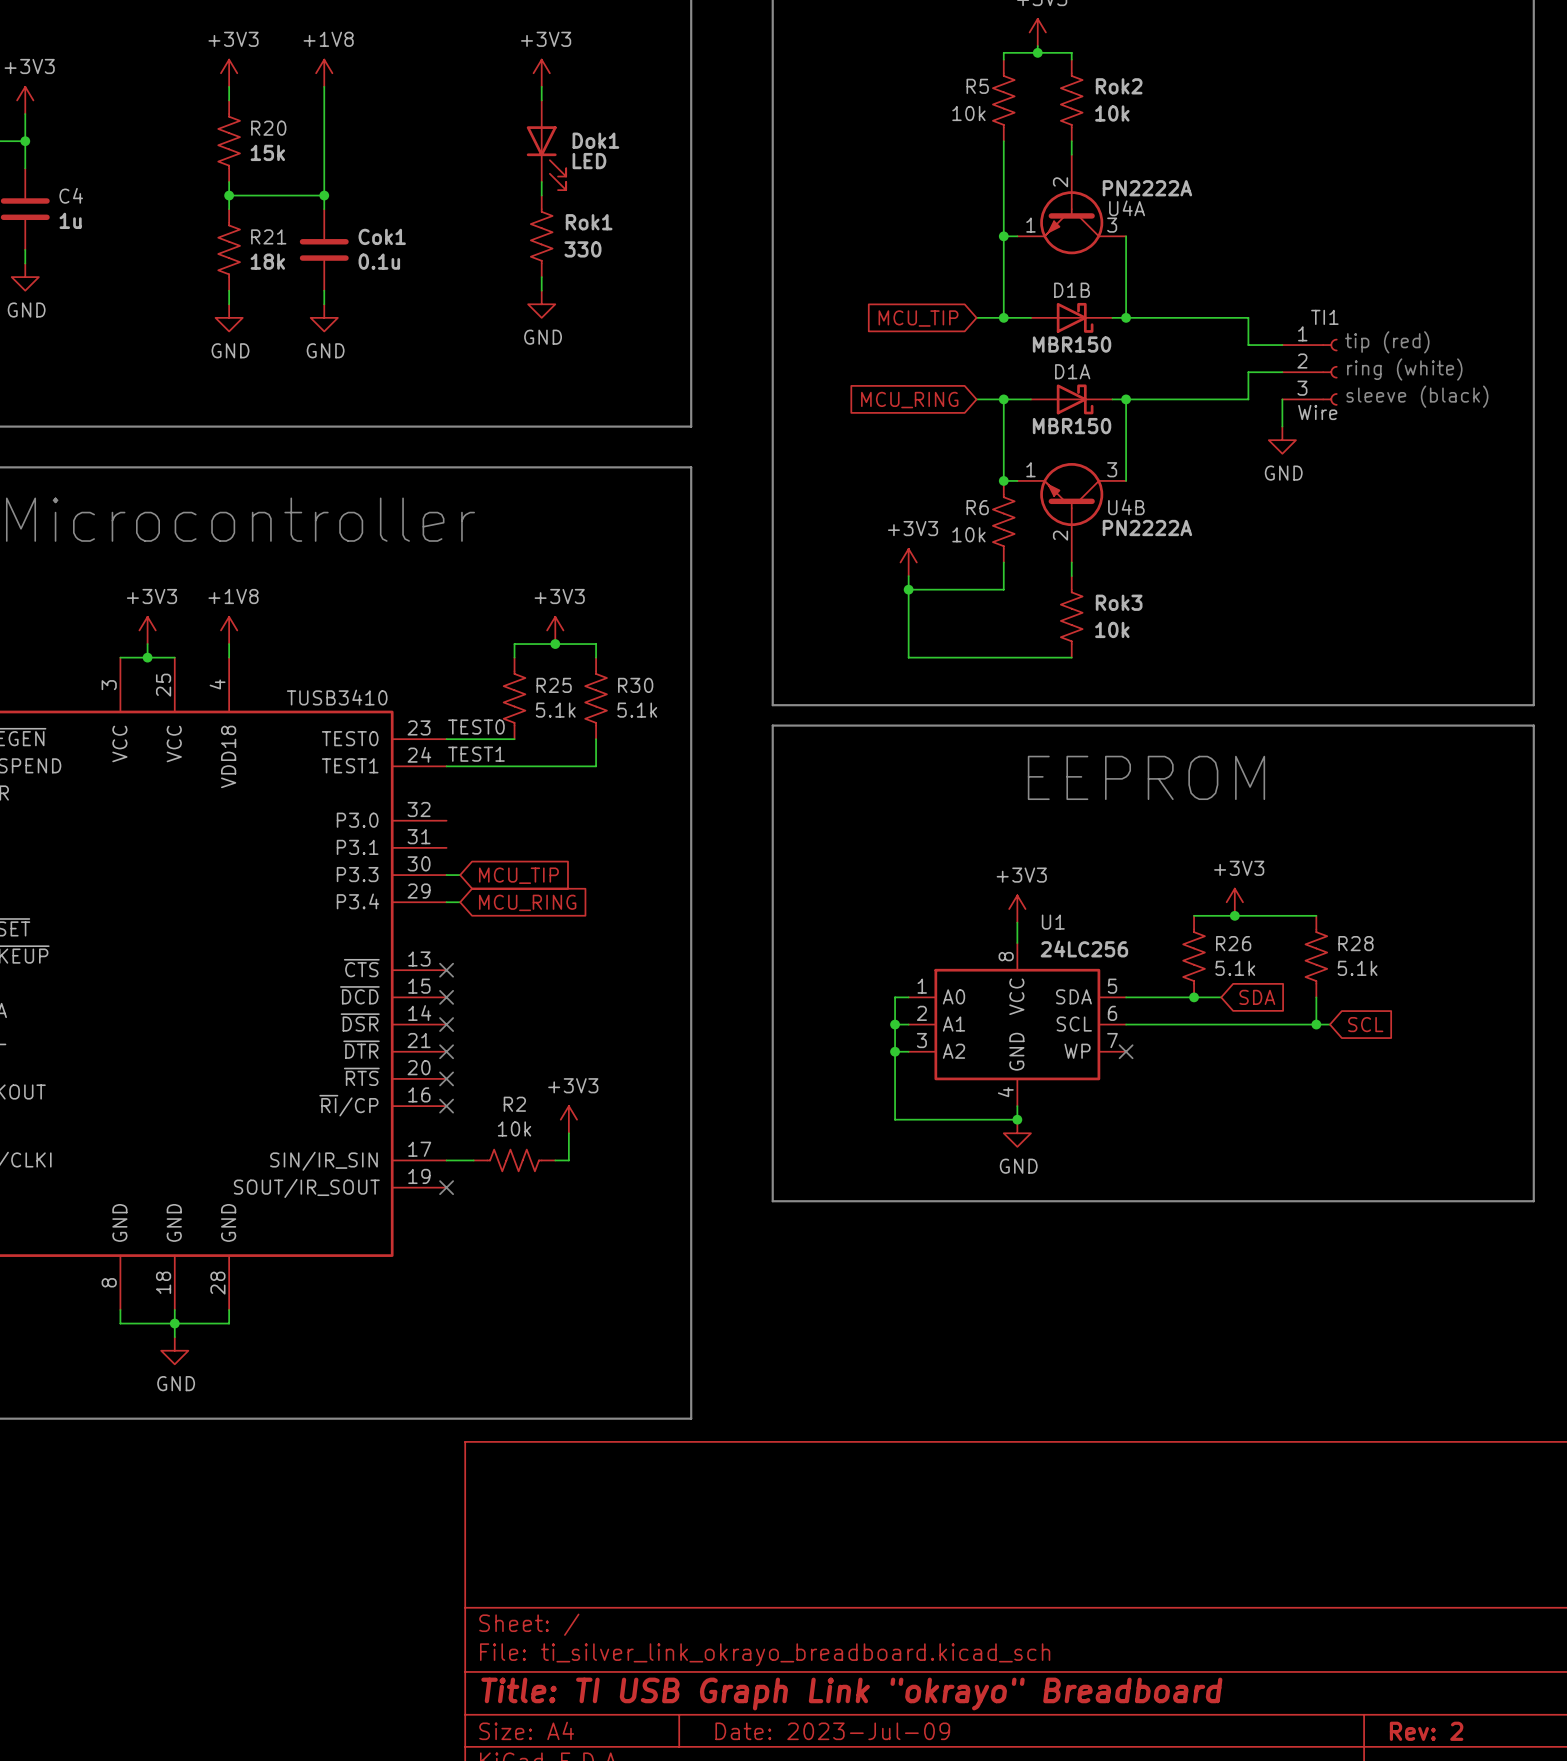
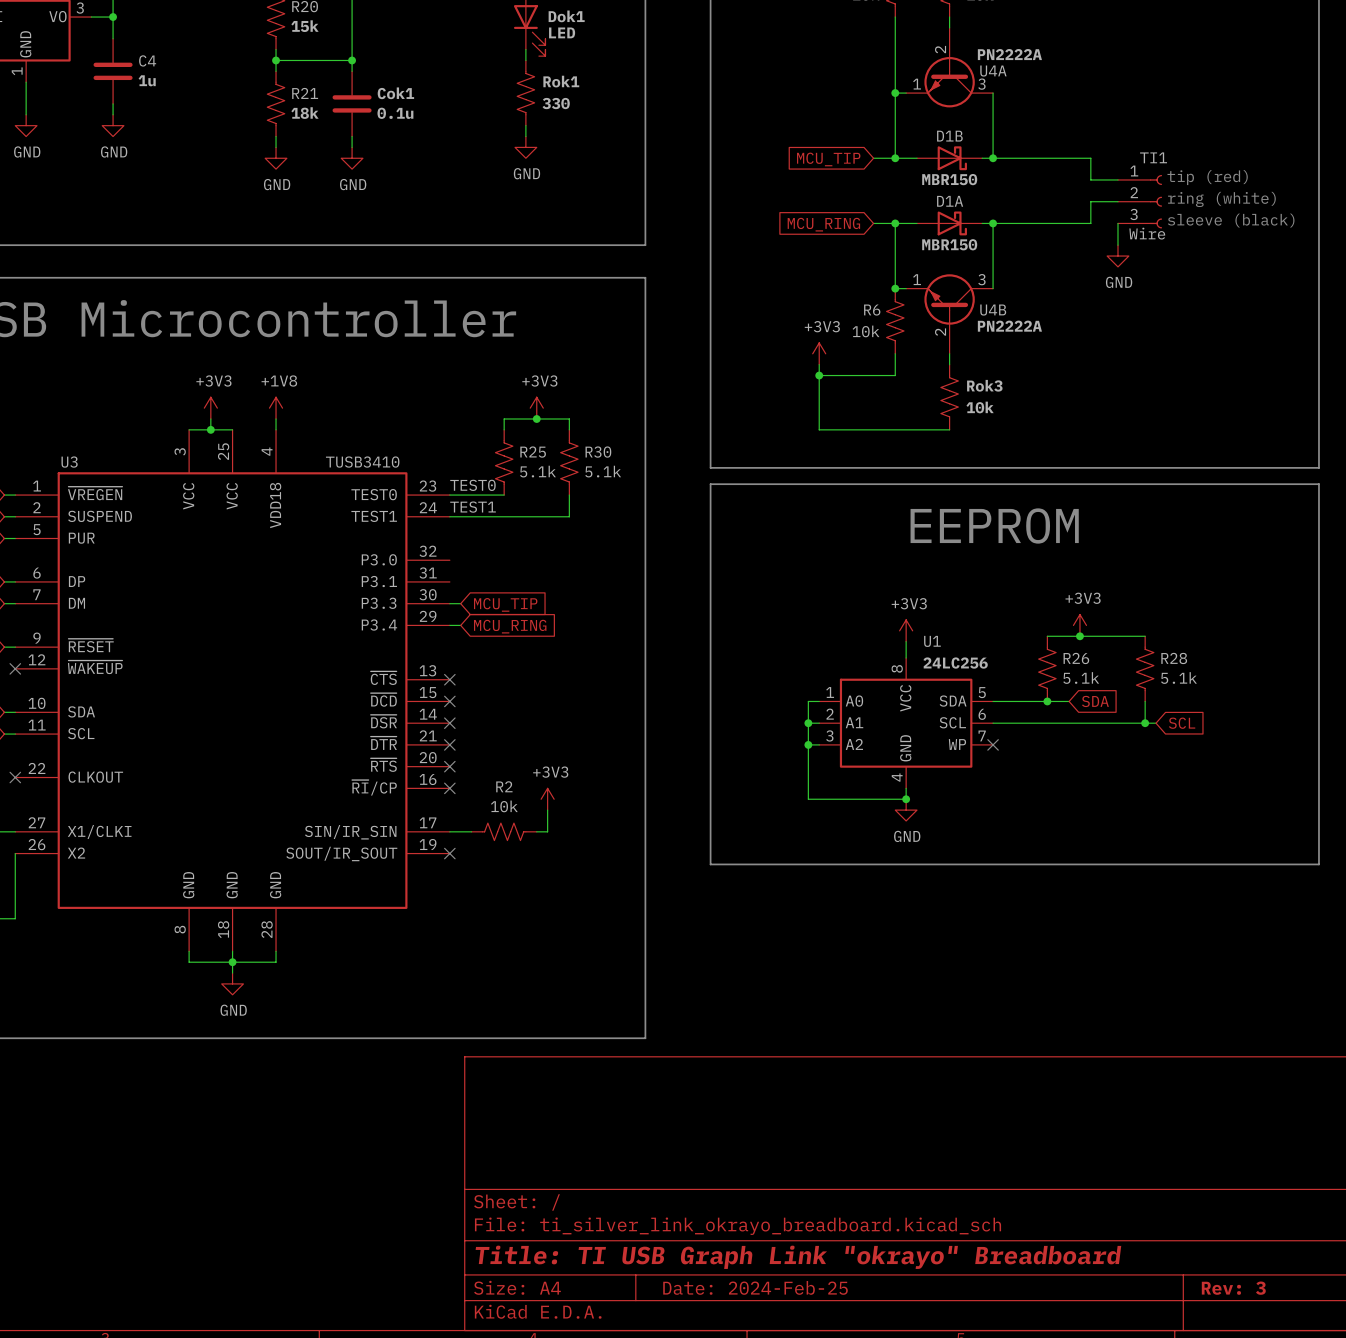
title block: Date: 2023-Jul-09 (832, 1731) -> Date: 2024-Feb-25 (755, 1287)
title block: Rev: 2 (1426, 1731) -> Rev: 3 (1233, 1288)

